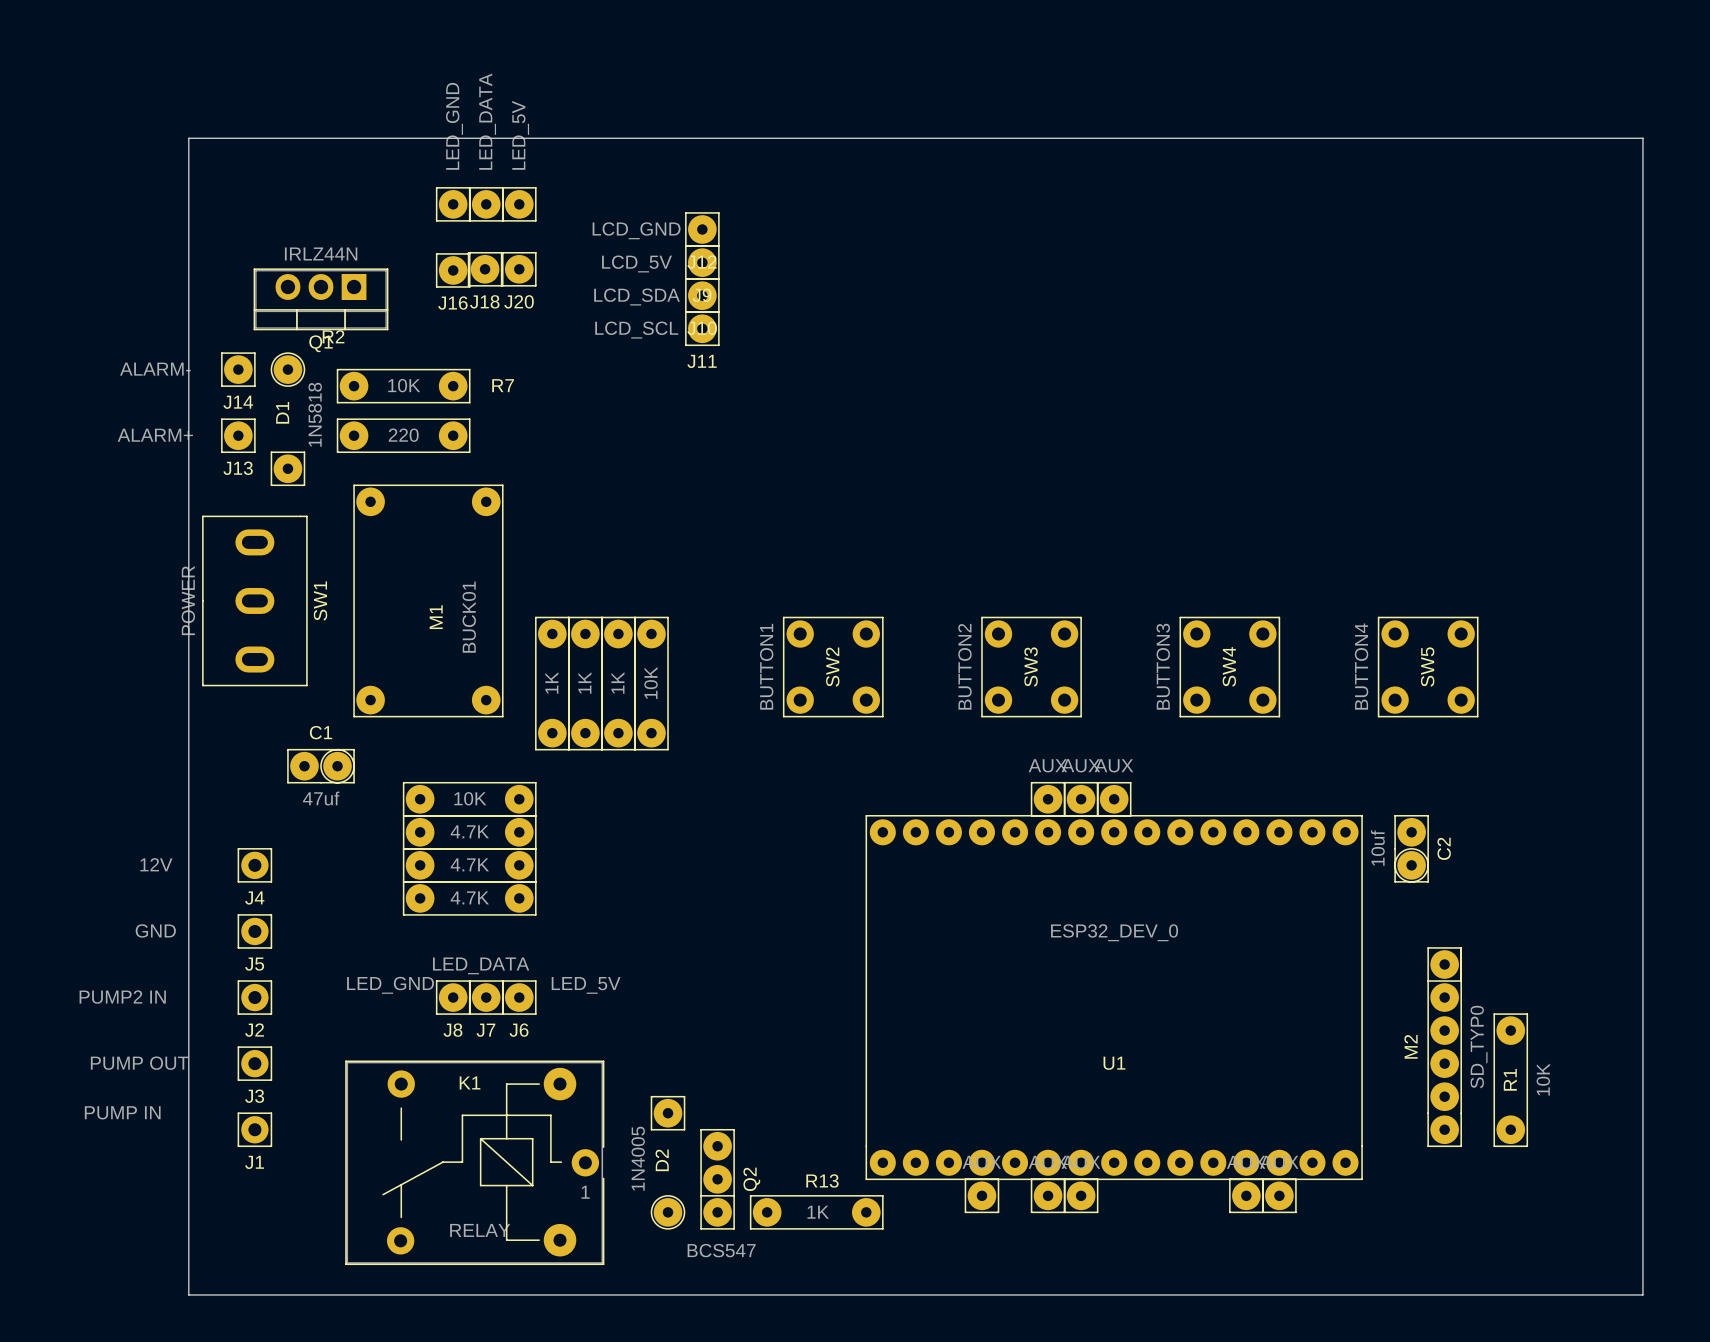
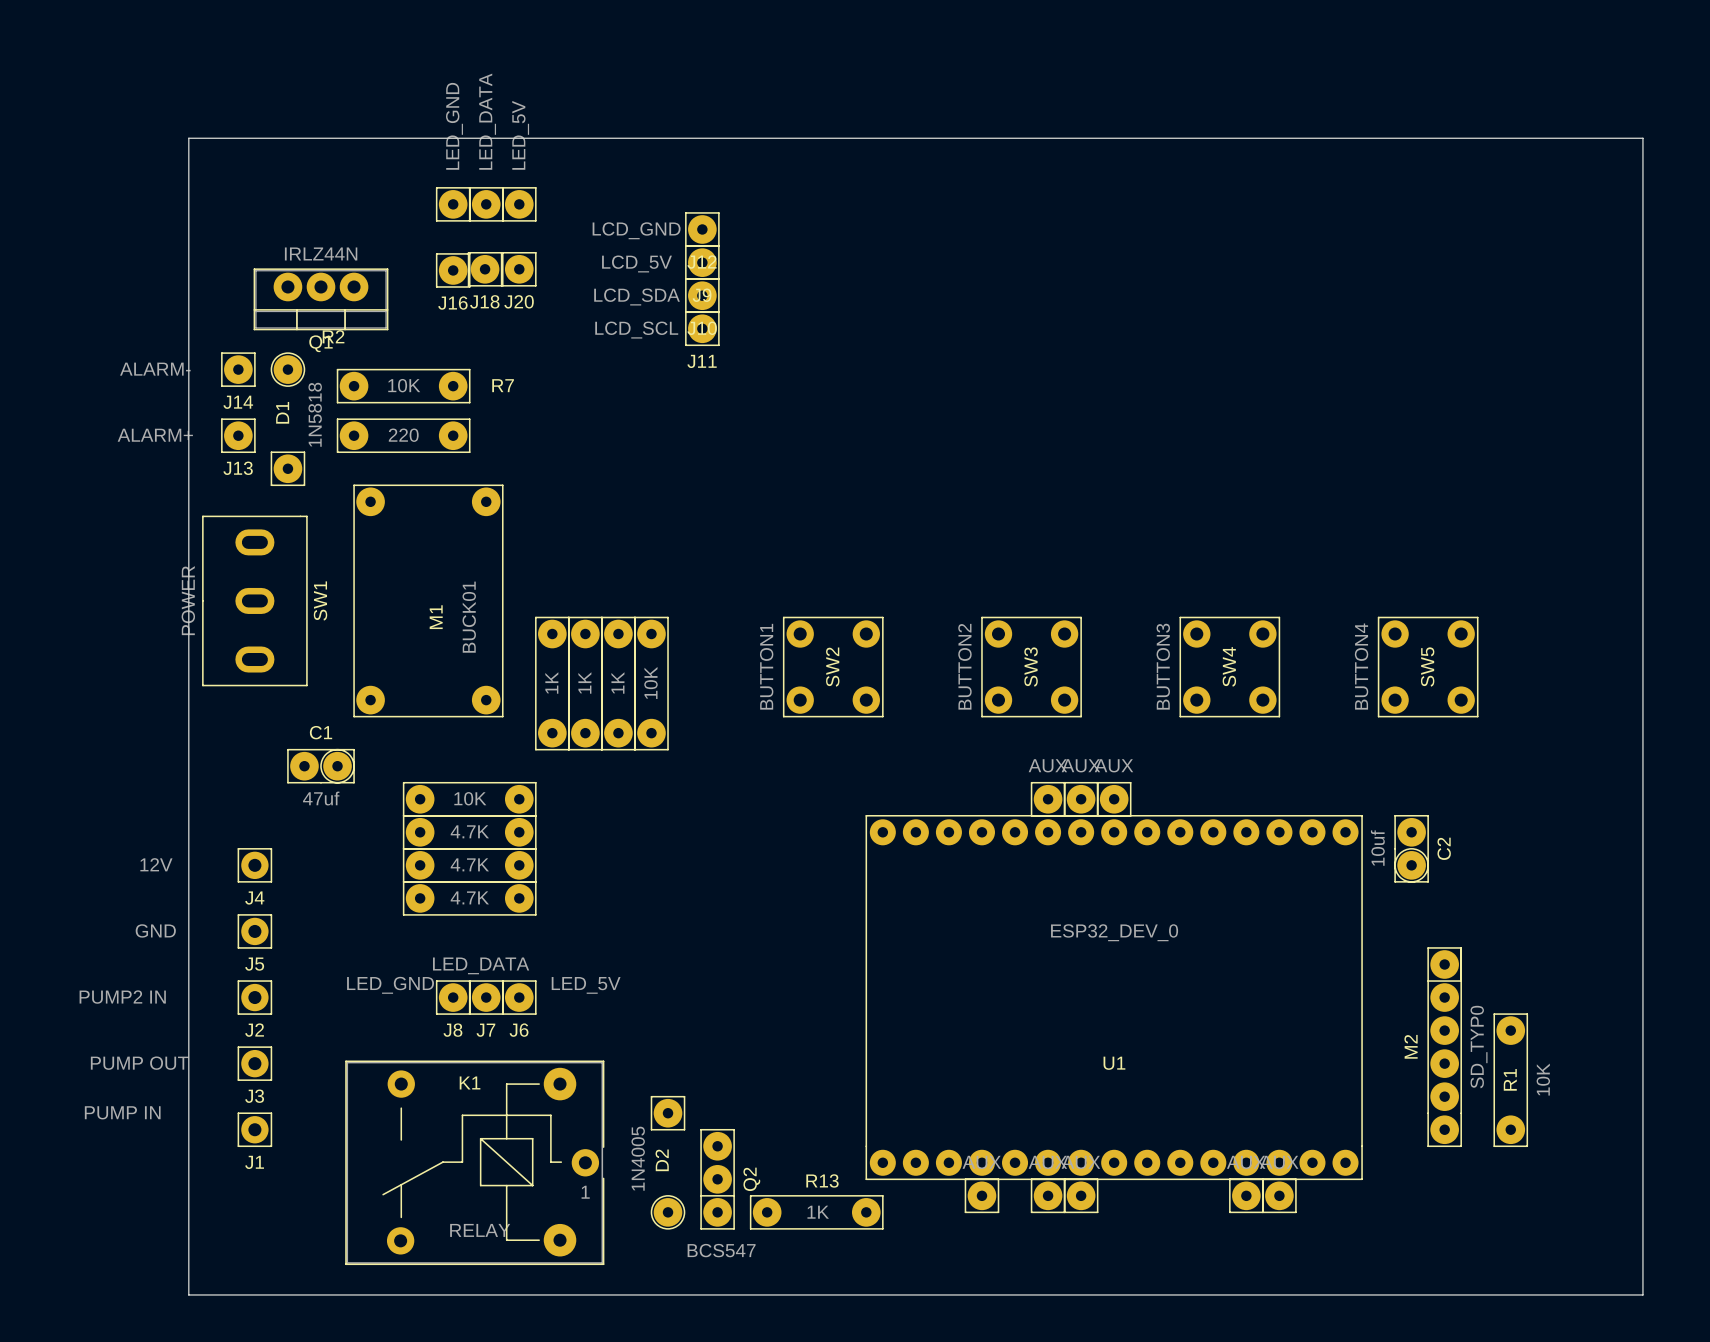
Q1 footprint: [253, 268, 389, 331] -> [253, 268, 389, 331]

